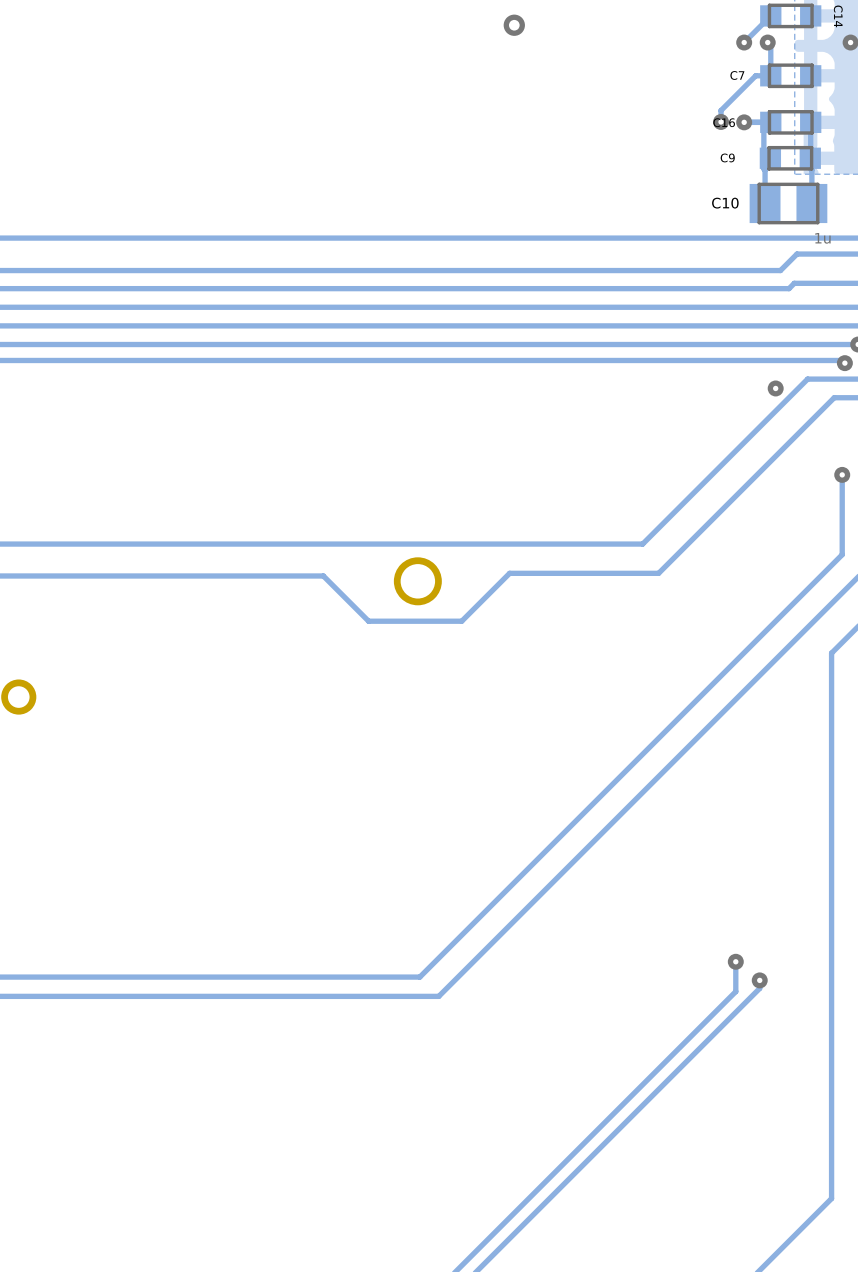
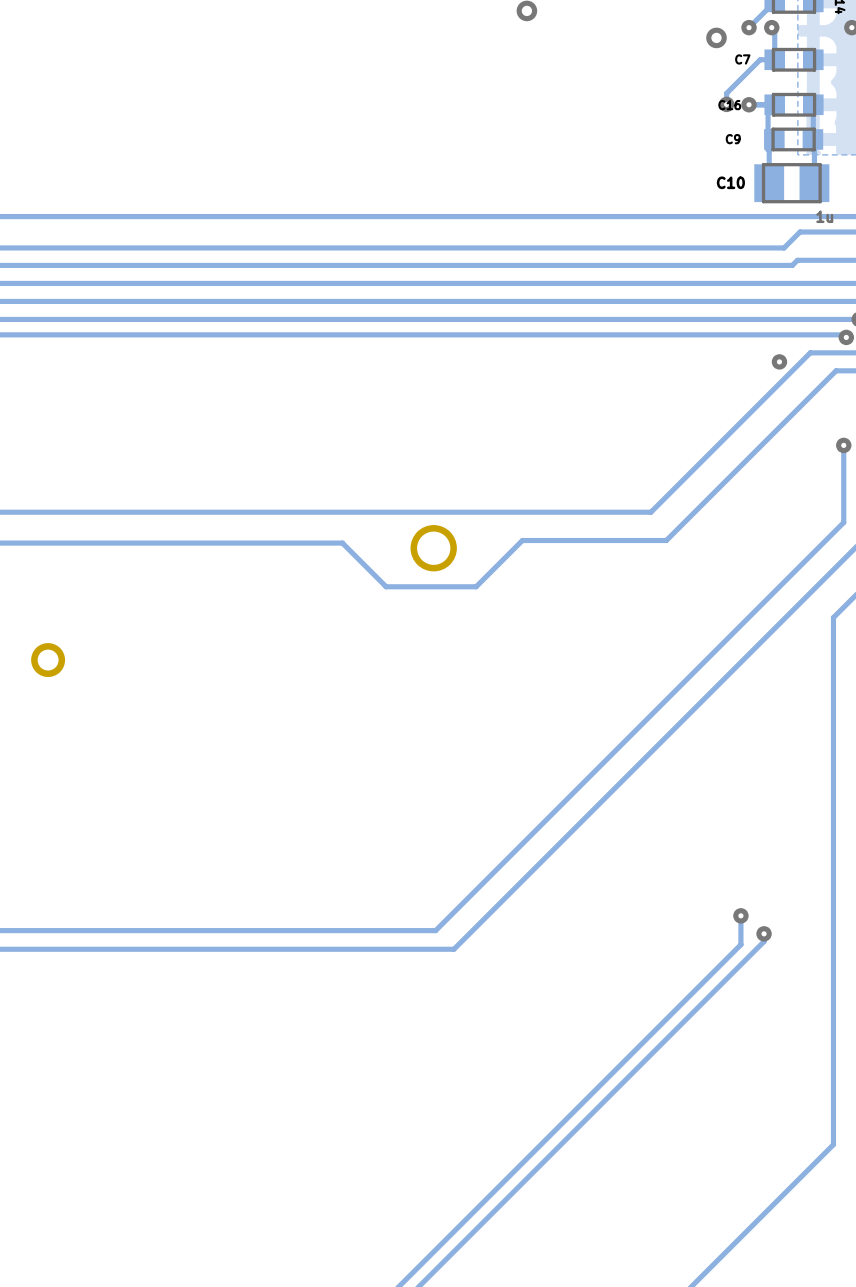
via: none -> (716, 37)

